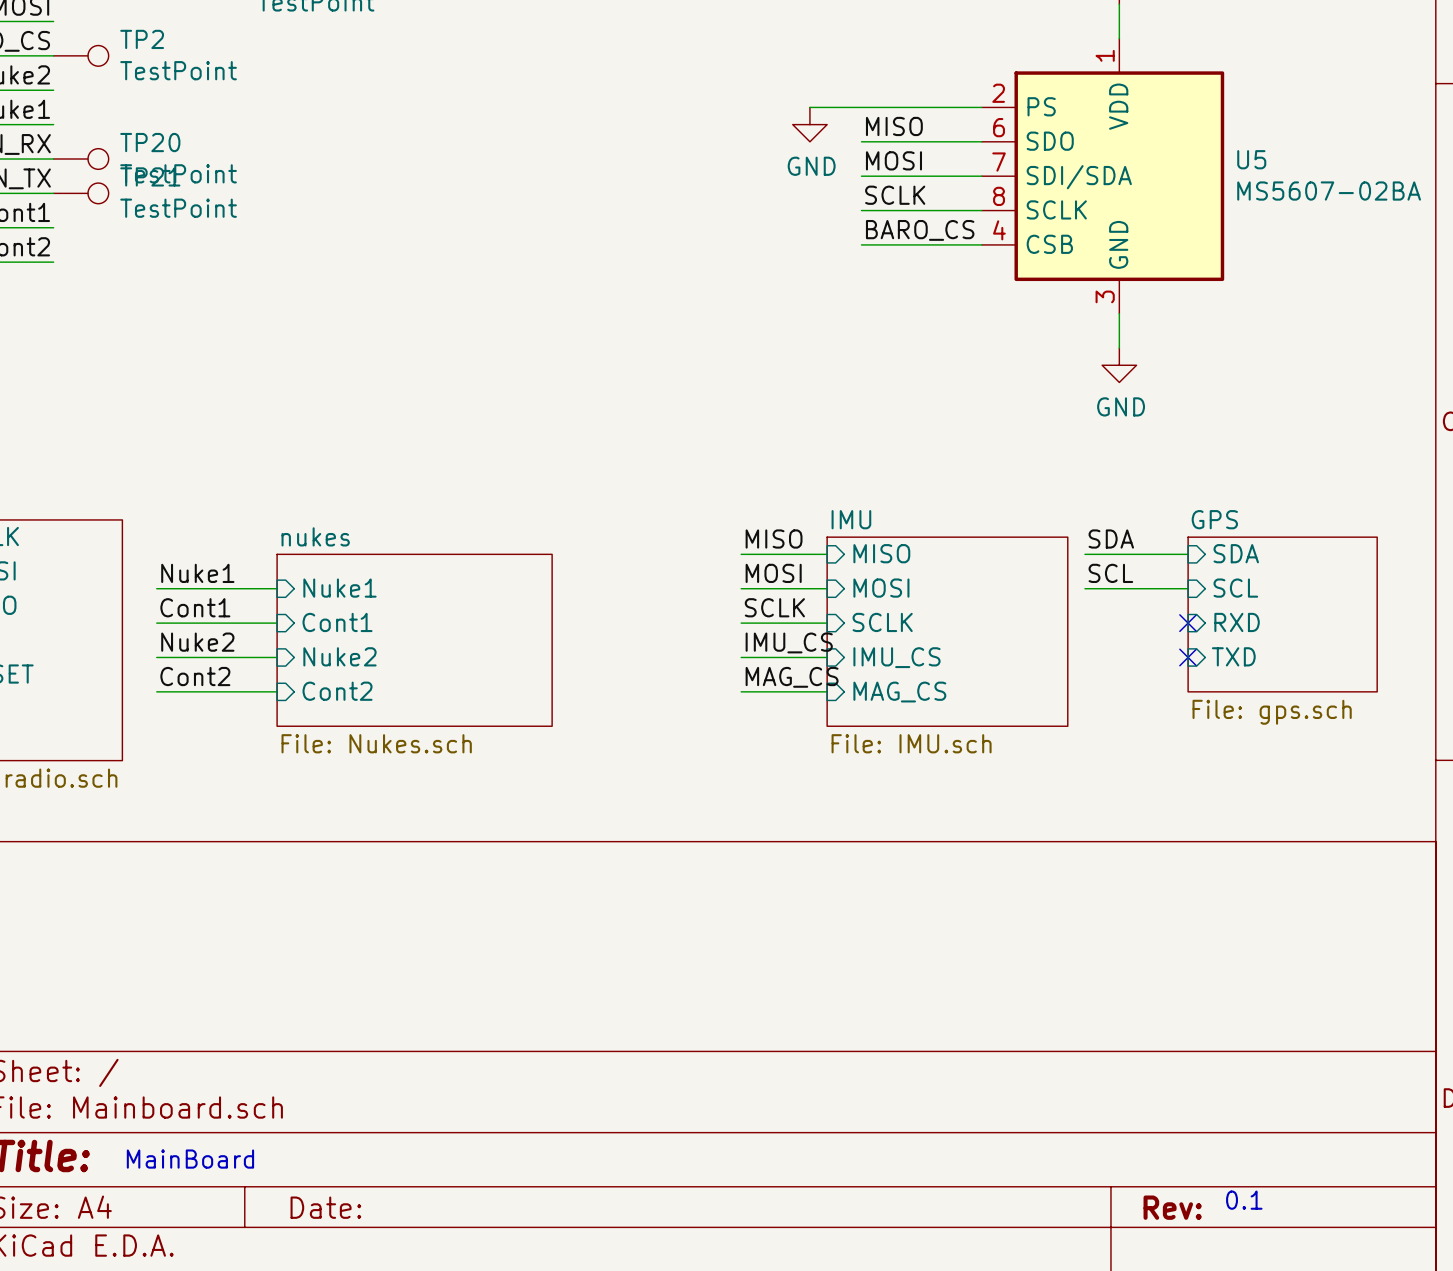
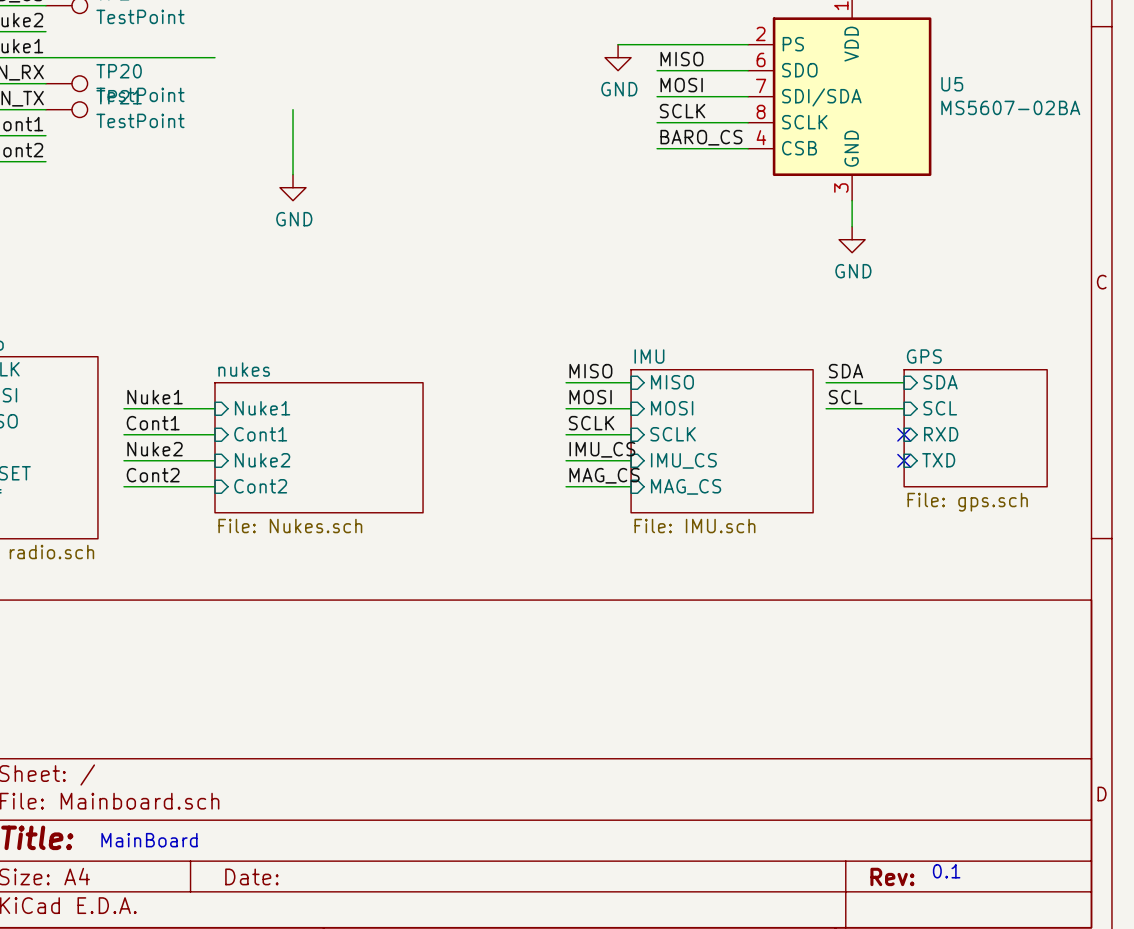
wire: none -> (45, 57) (214, 57)
wire: none -> (293, 109) (293, 174)
power symbol: none -> GND (293, 187)

